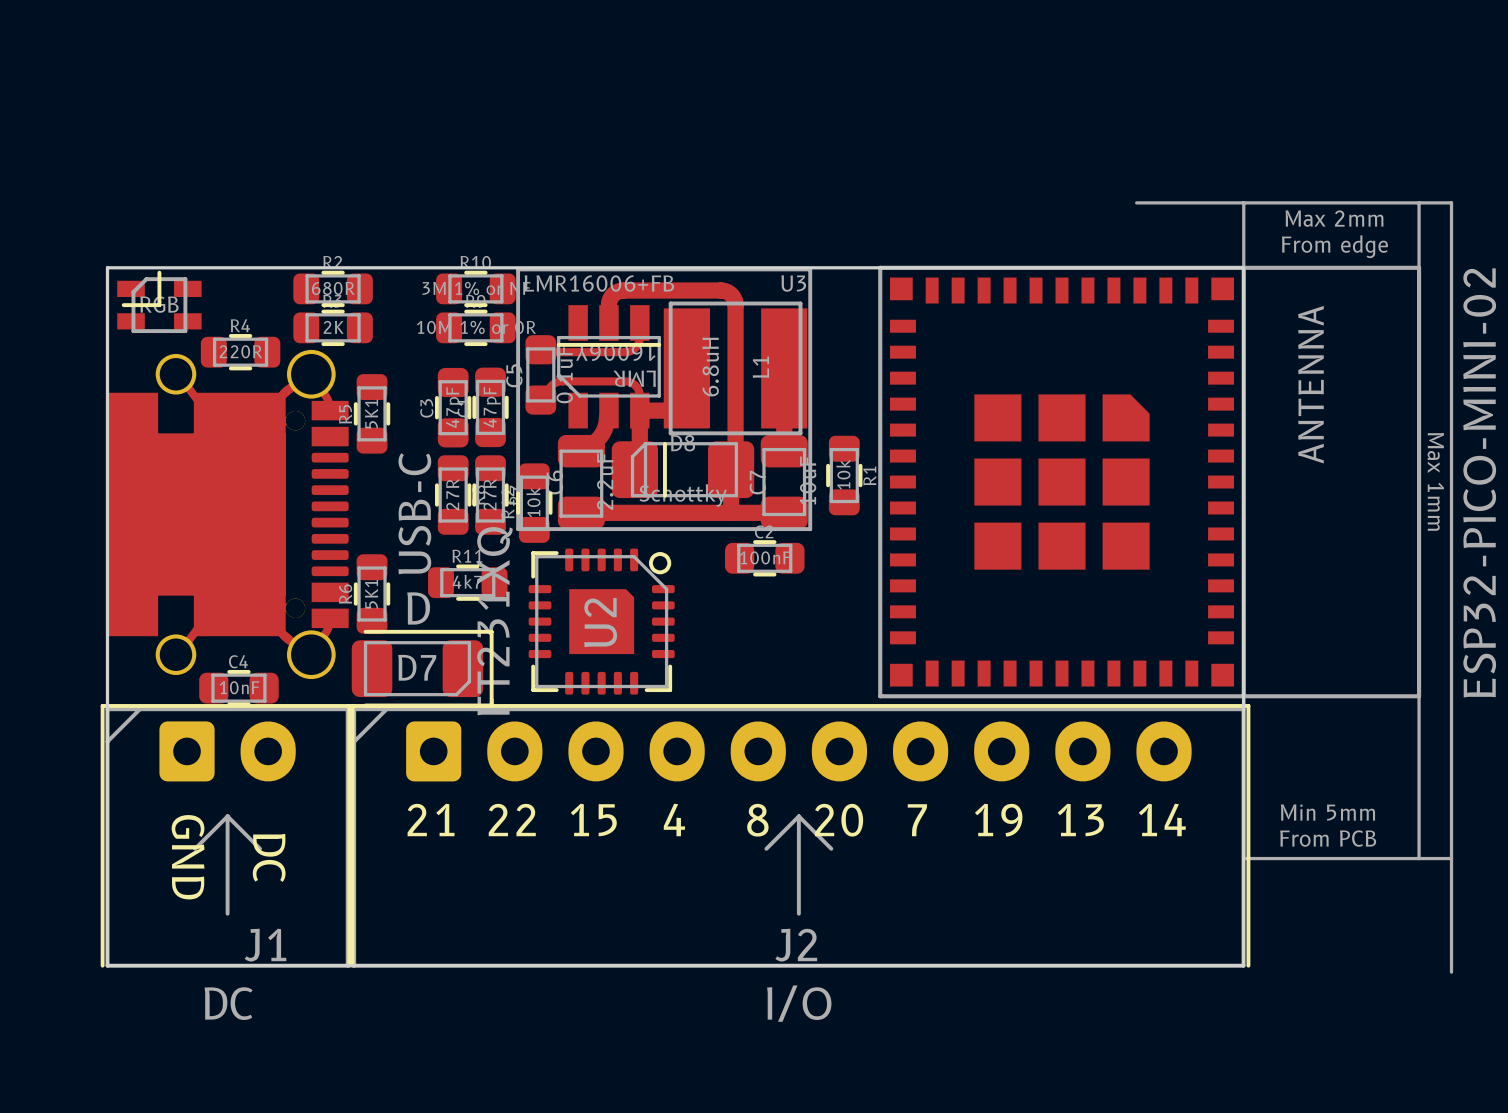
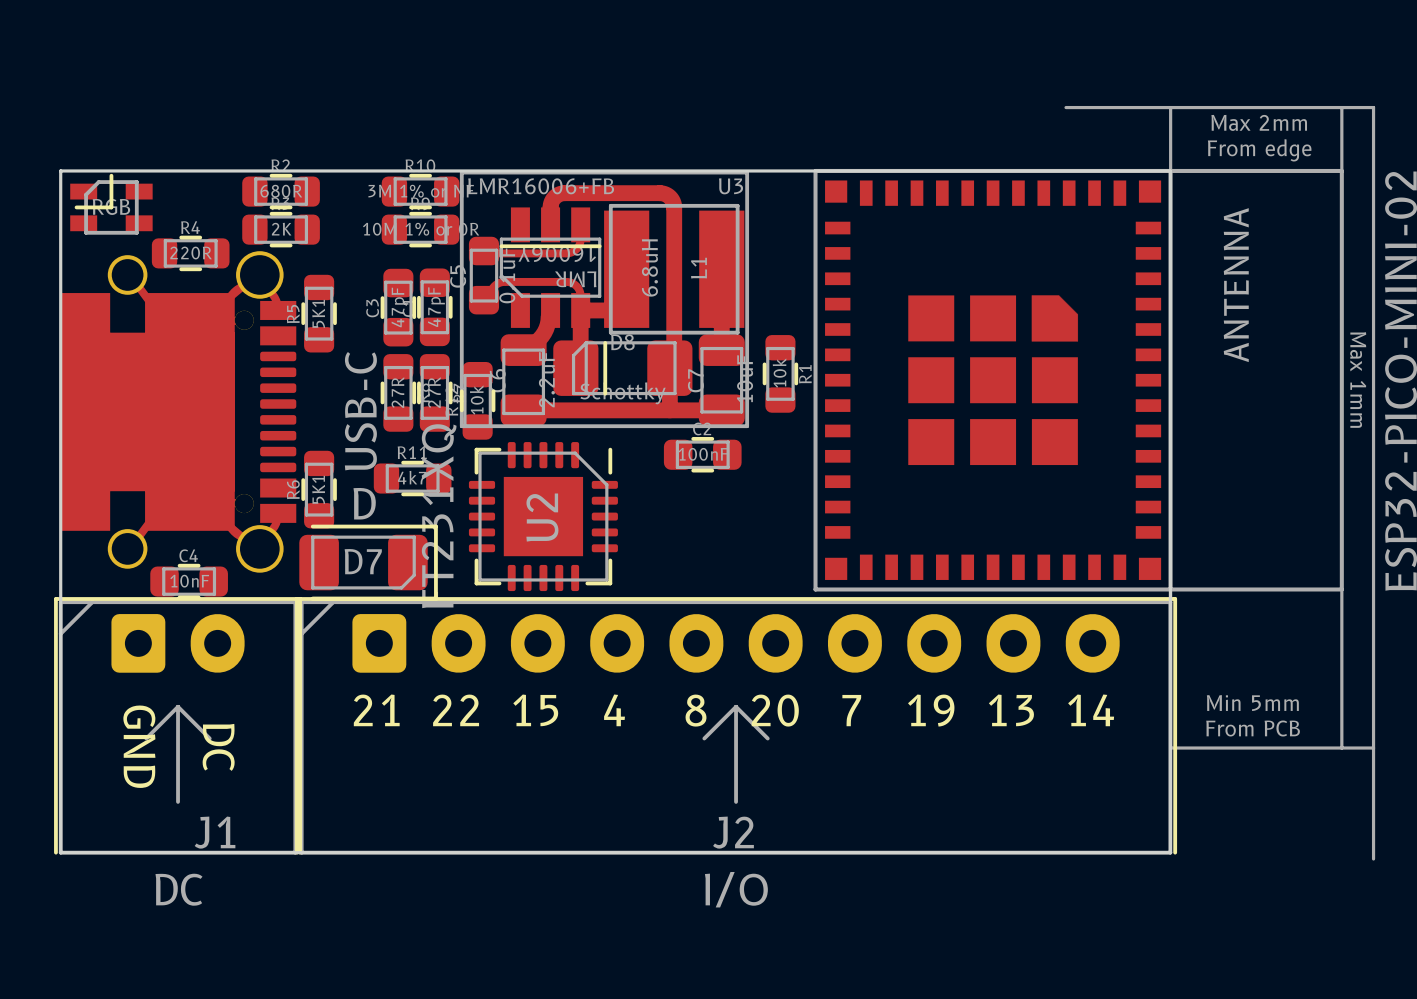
part footprint: [878, 201, 1454, 974] -> [813, 105, 1376, 861]
U2 footprint: [528, 548, 675, 695] -> [468, 442, 618, 592]

